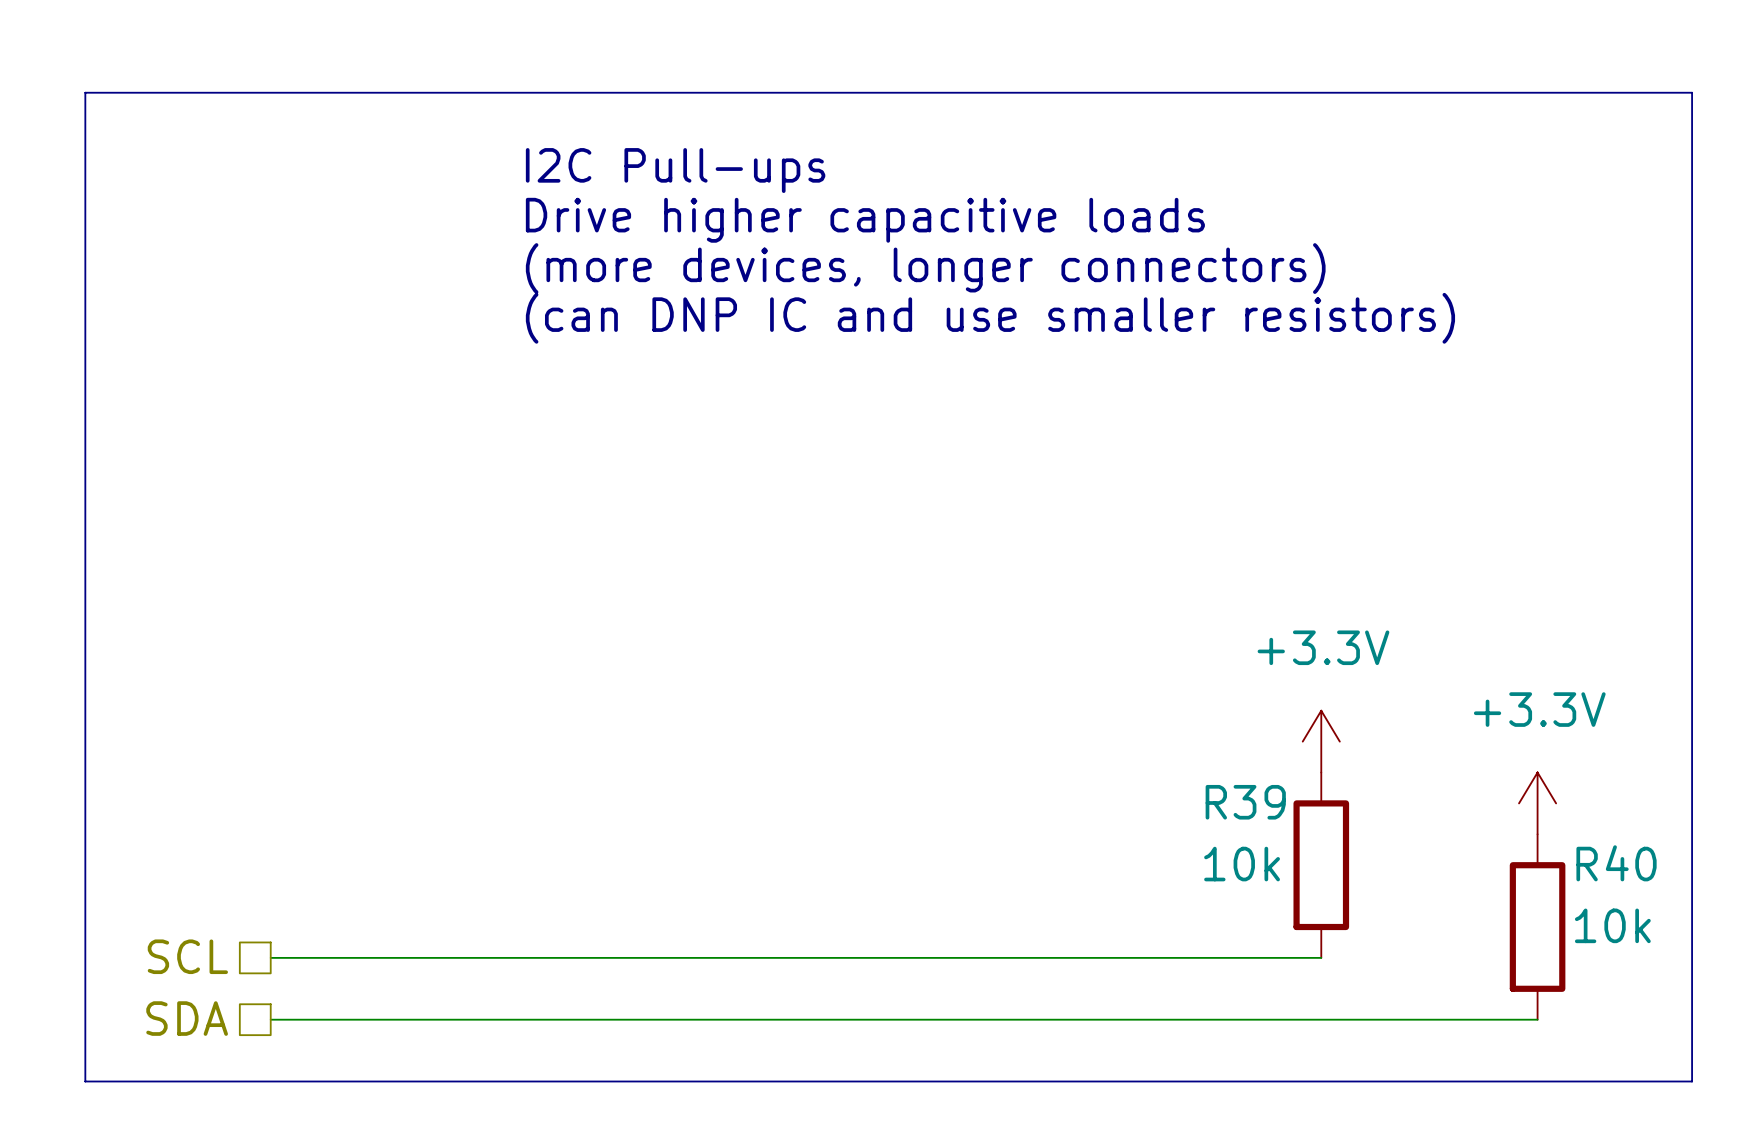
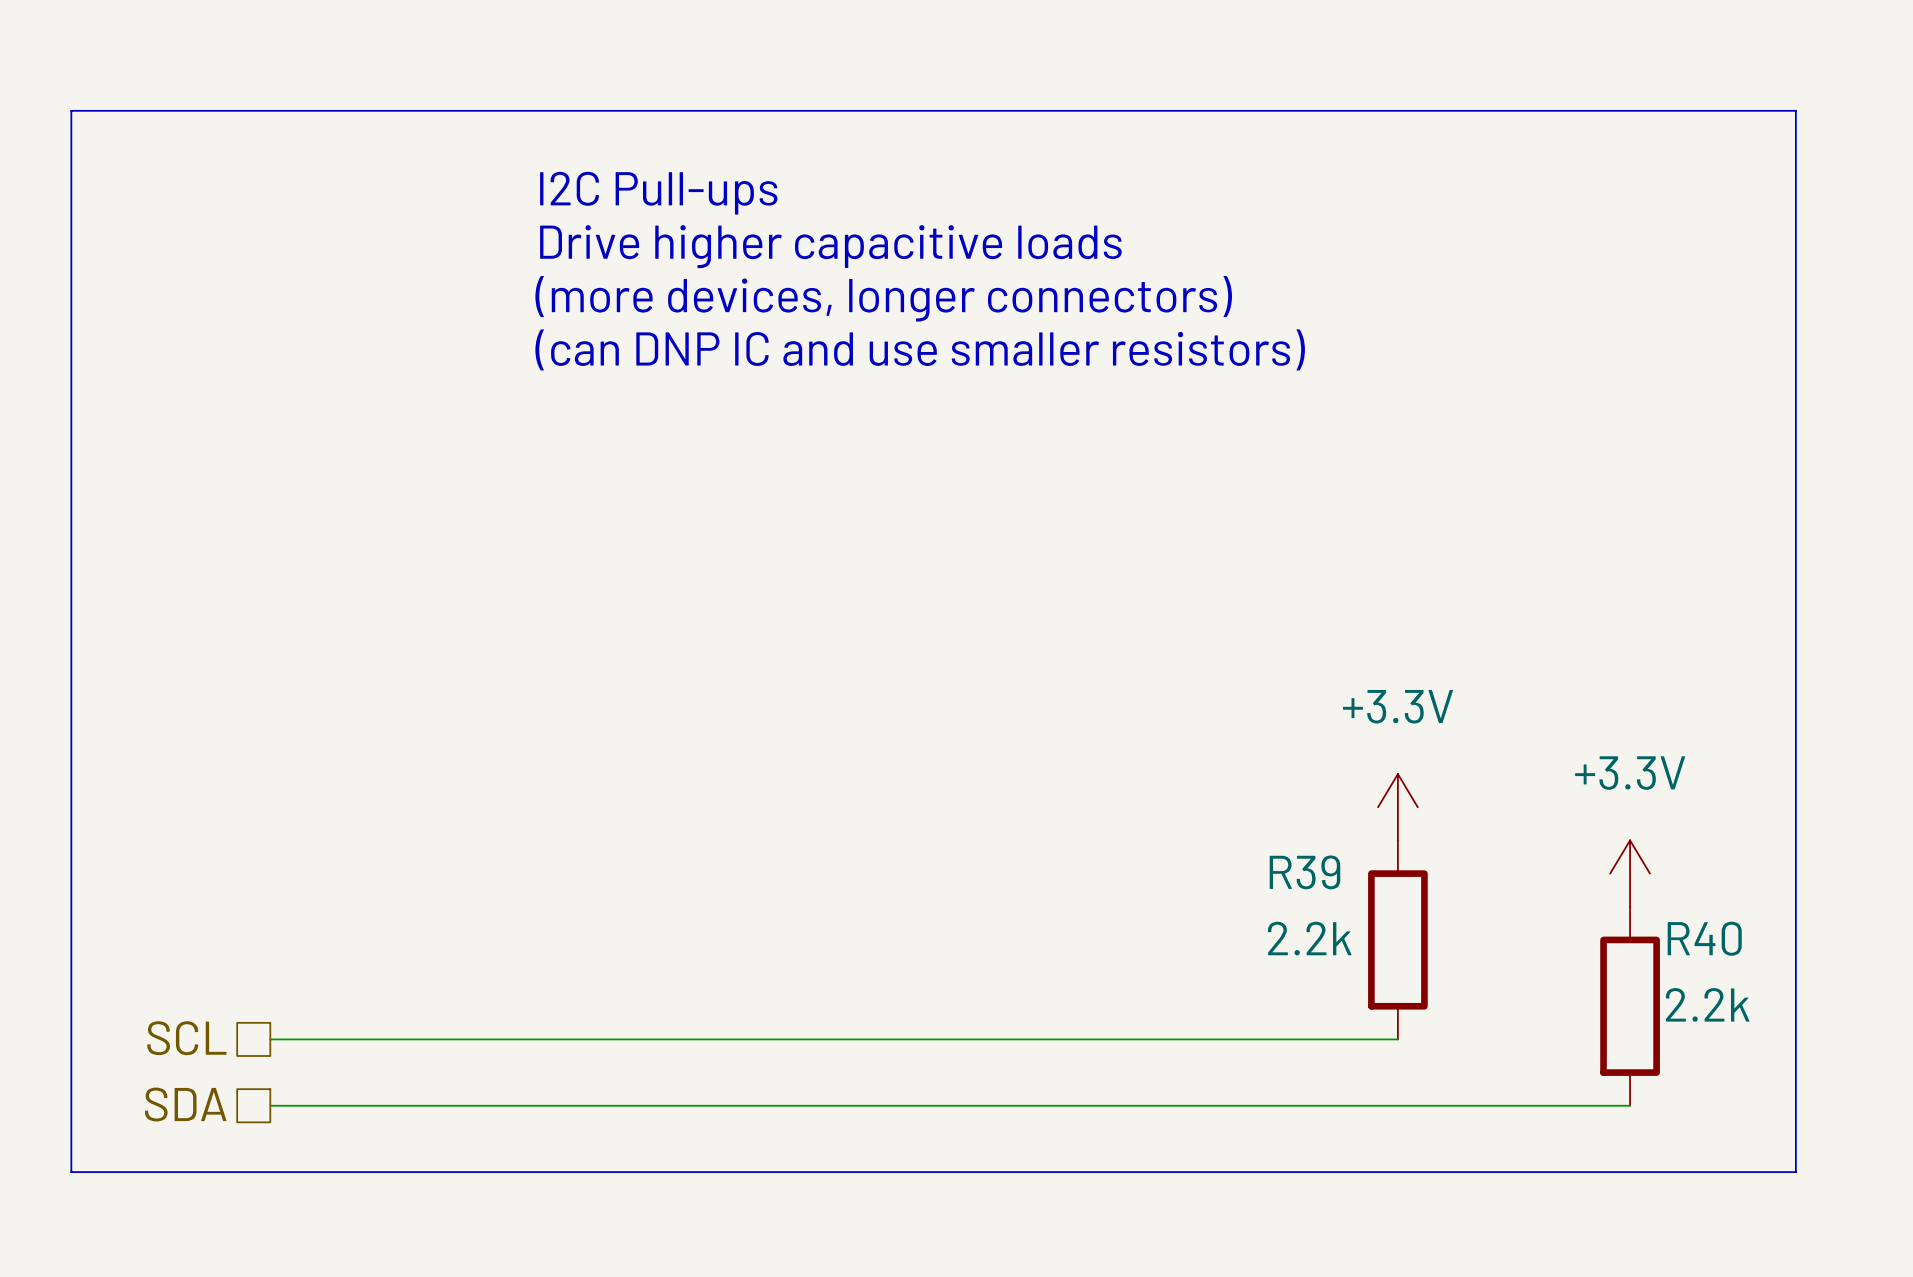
R39 value: 10k (1242, 864) -> 2.2k (1309, 938)
R40 value: 10k (1612, 925) -> 2.2k (1707, 1004)

